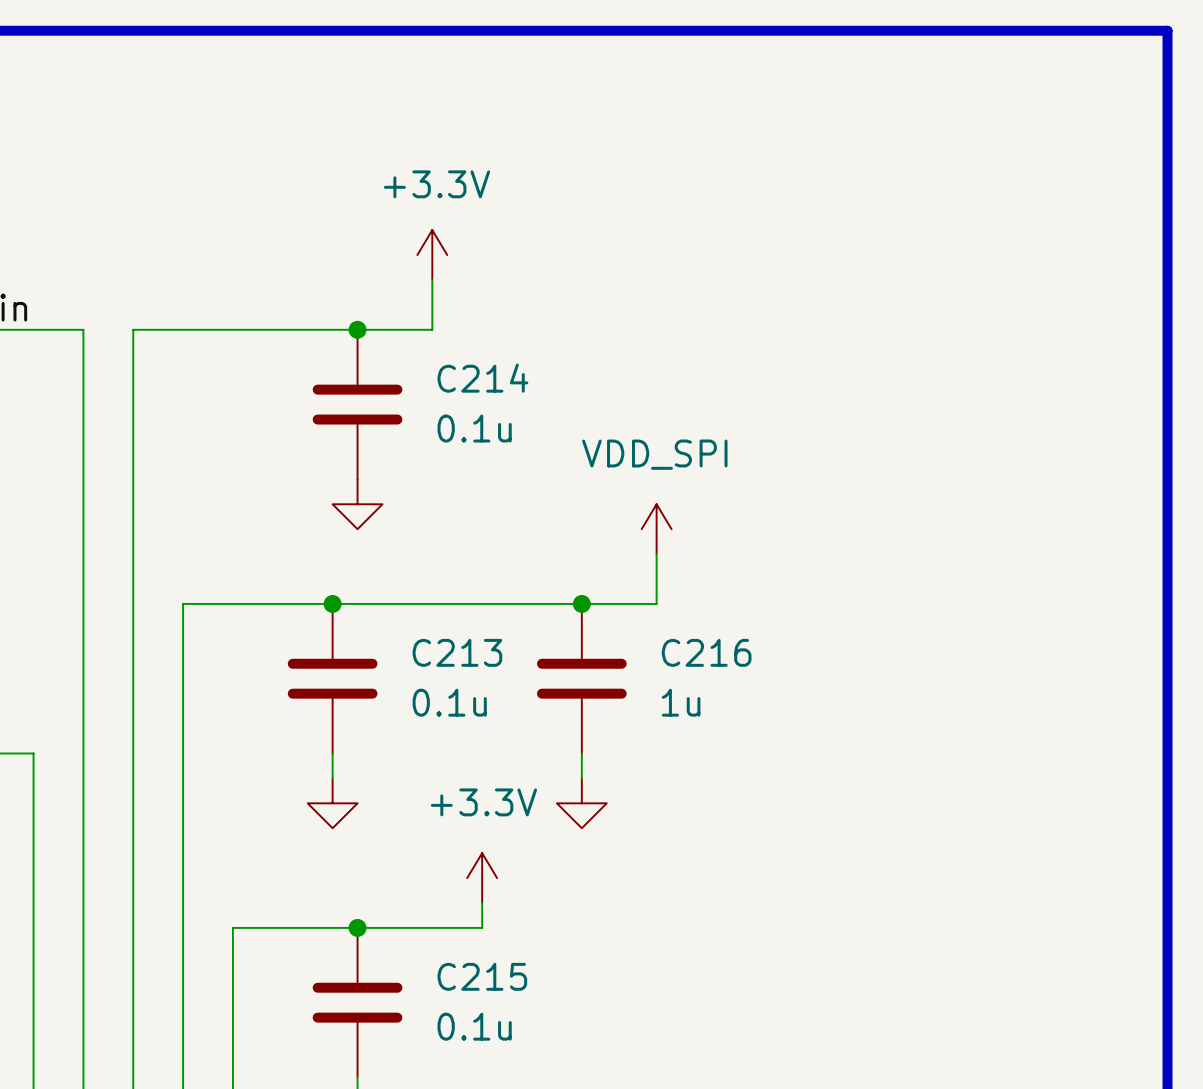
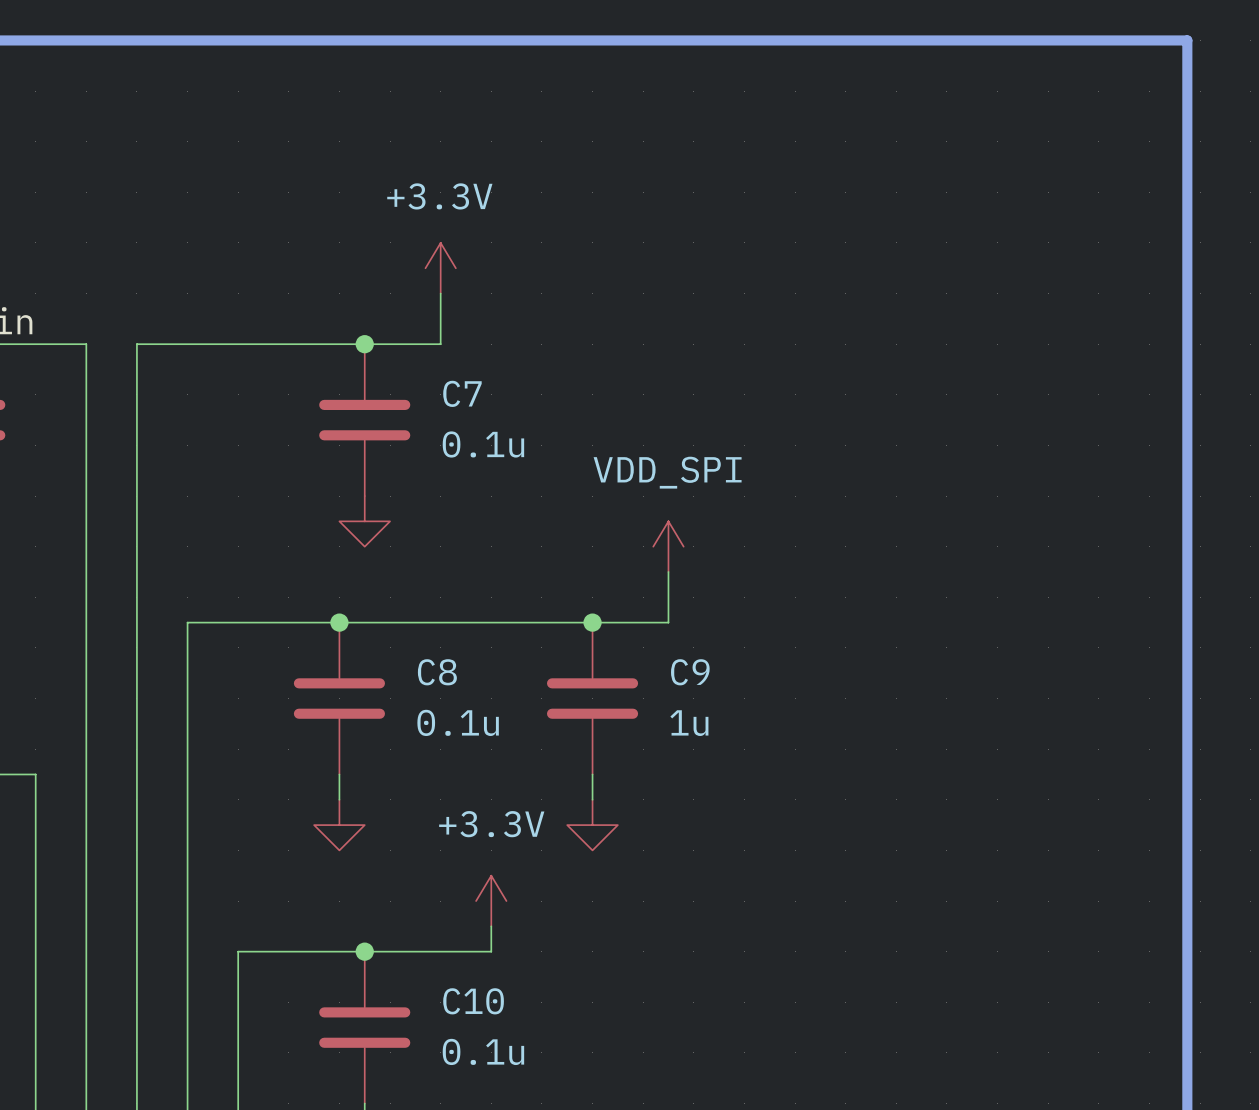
C214 name: C214 (482, 378) -> C7 (462, 393)
C213 name: C213 (457, 652) -> C8 (437, 672)
C216 name: C216 (706, 652) -> C9 (690, 672)
C215 name: C215 (482, 976) -> C10 (473, 1001)

